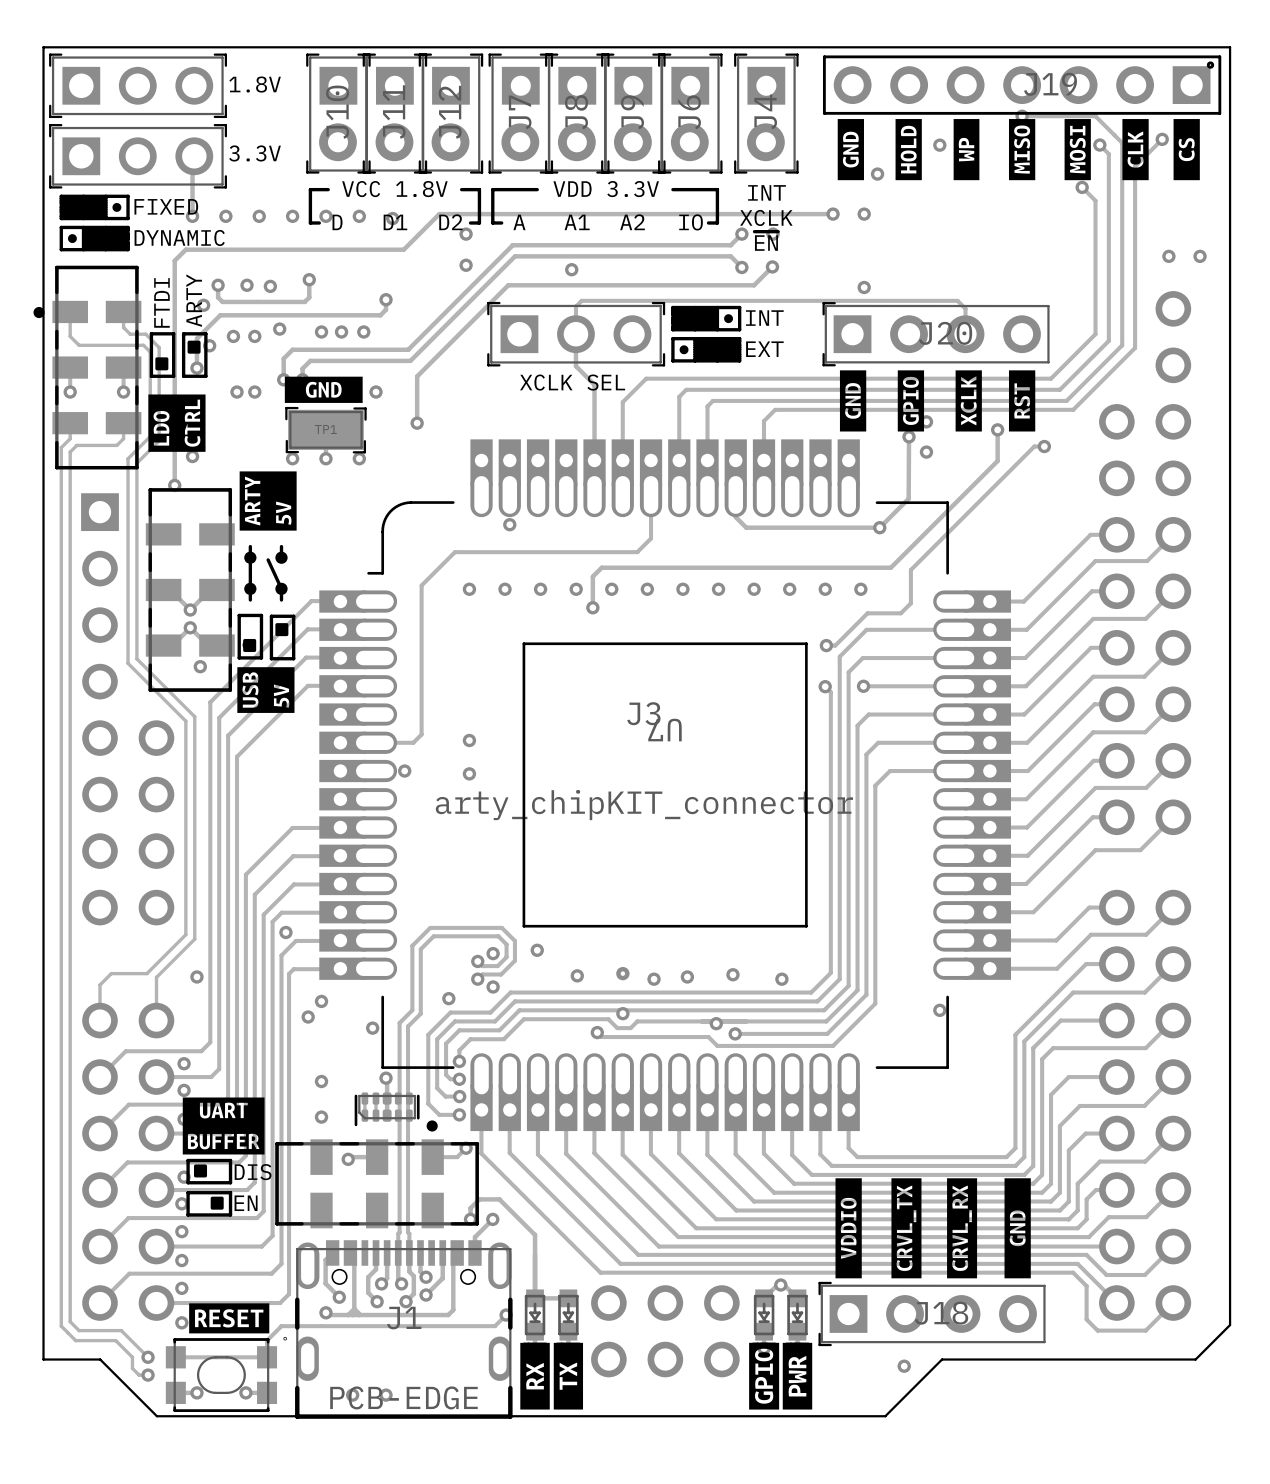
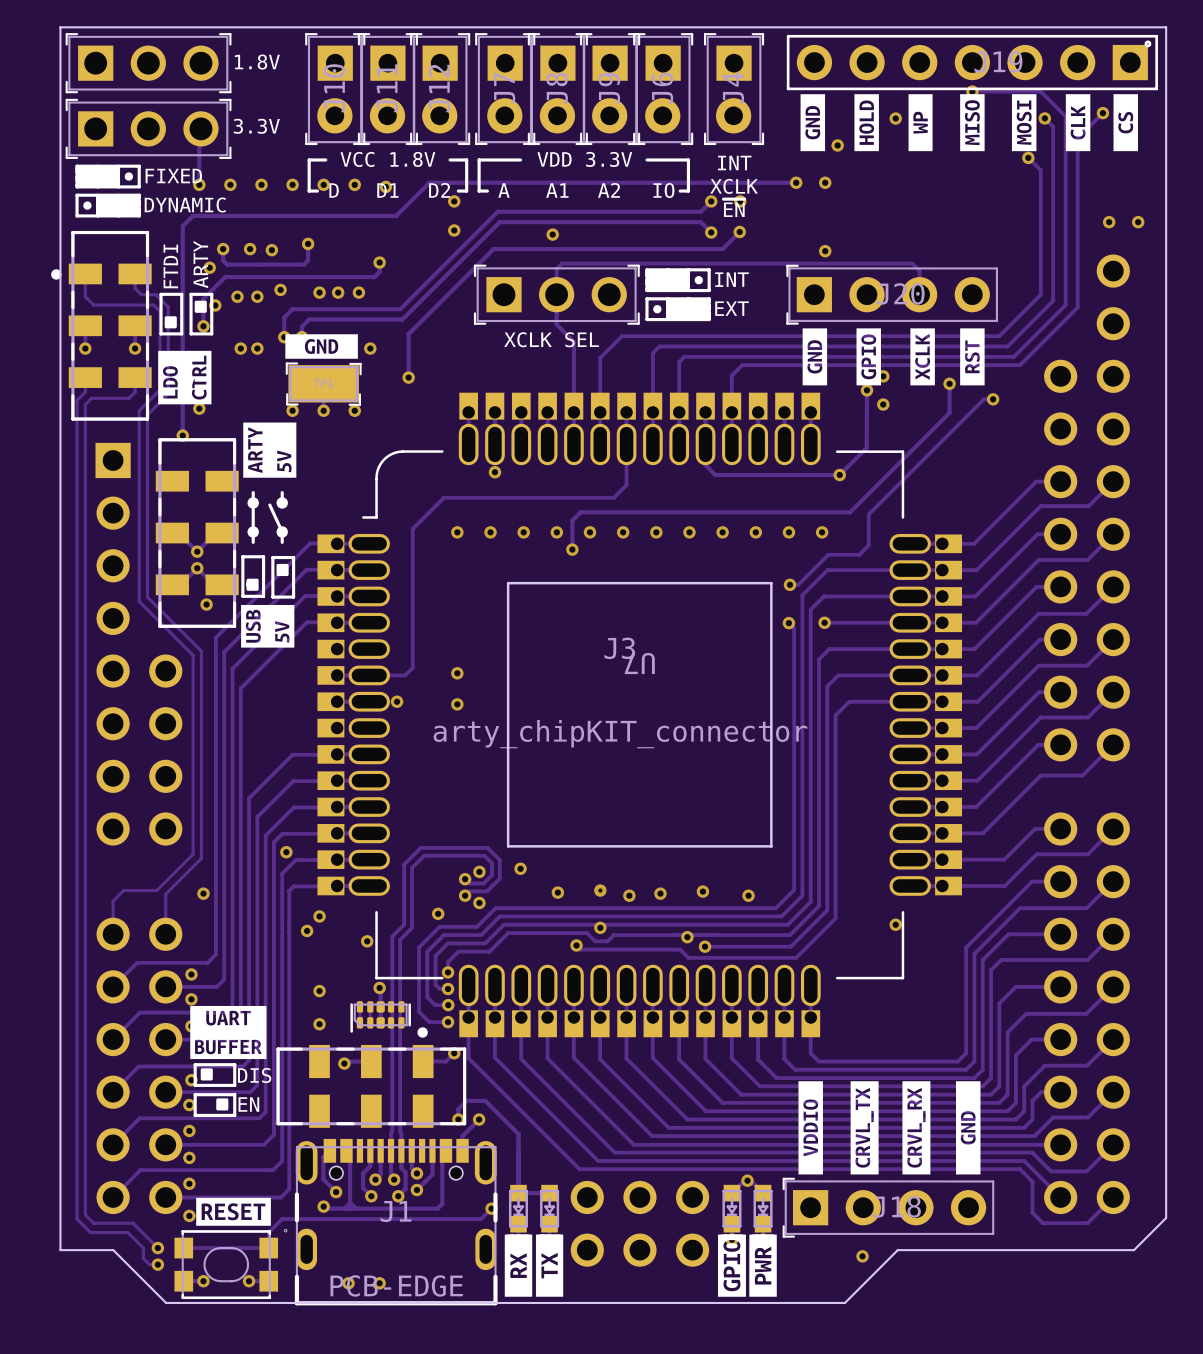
U7 footprint: [319, 439, 1011, 1132] -> [317, 392, 963, 1038]

